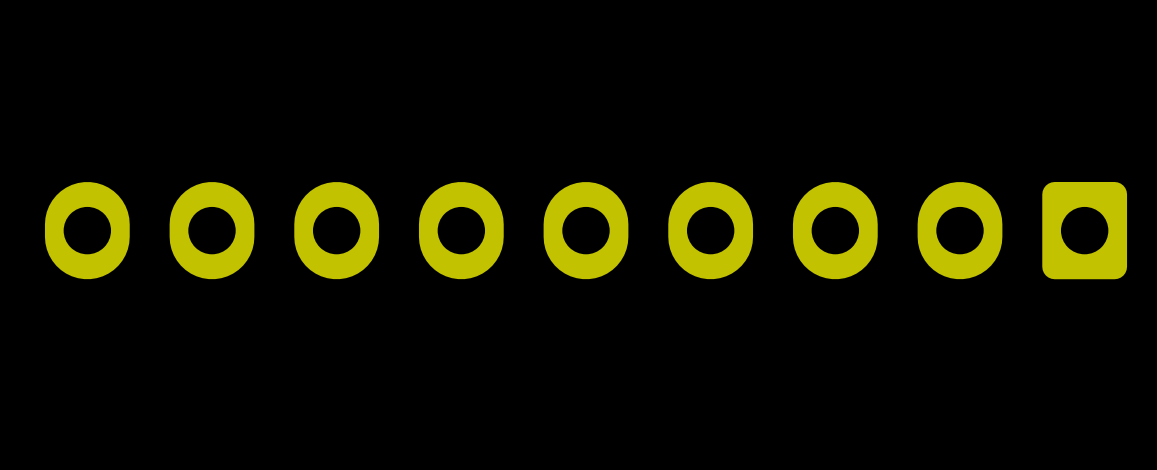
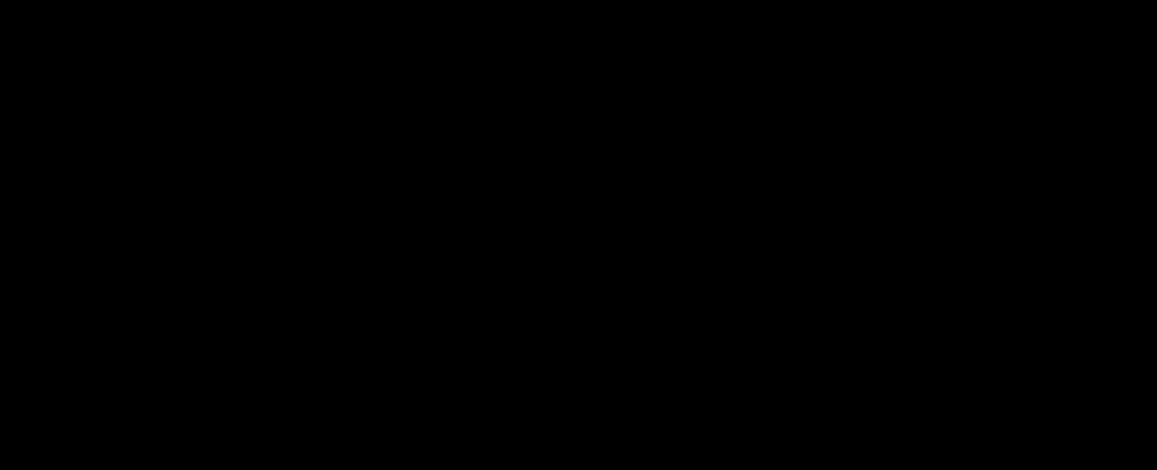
part: (586, 230) -> none

